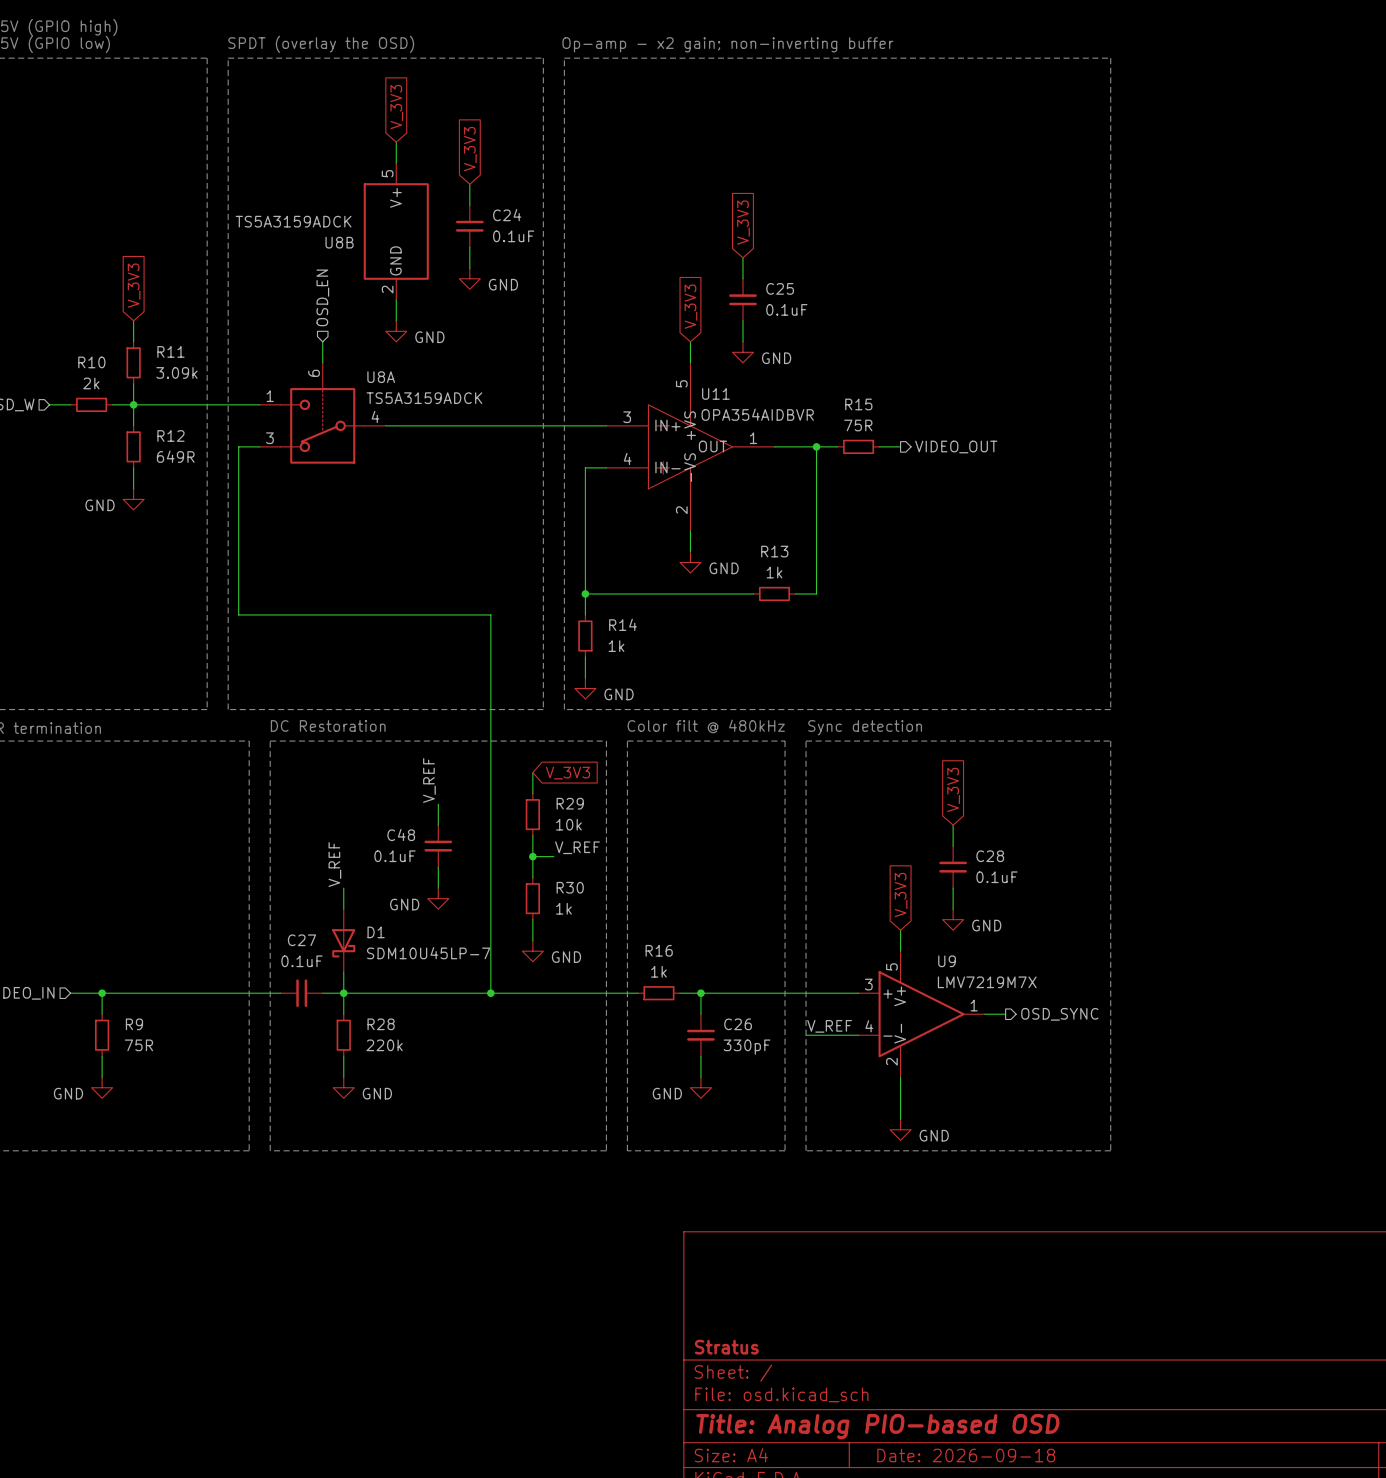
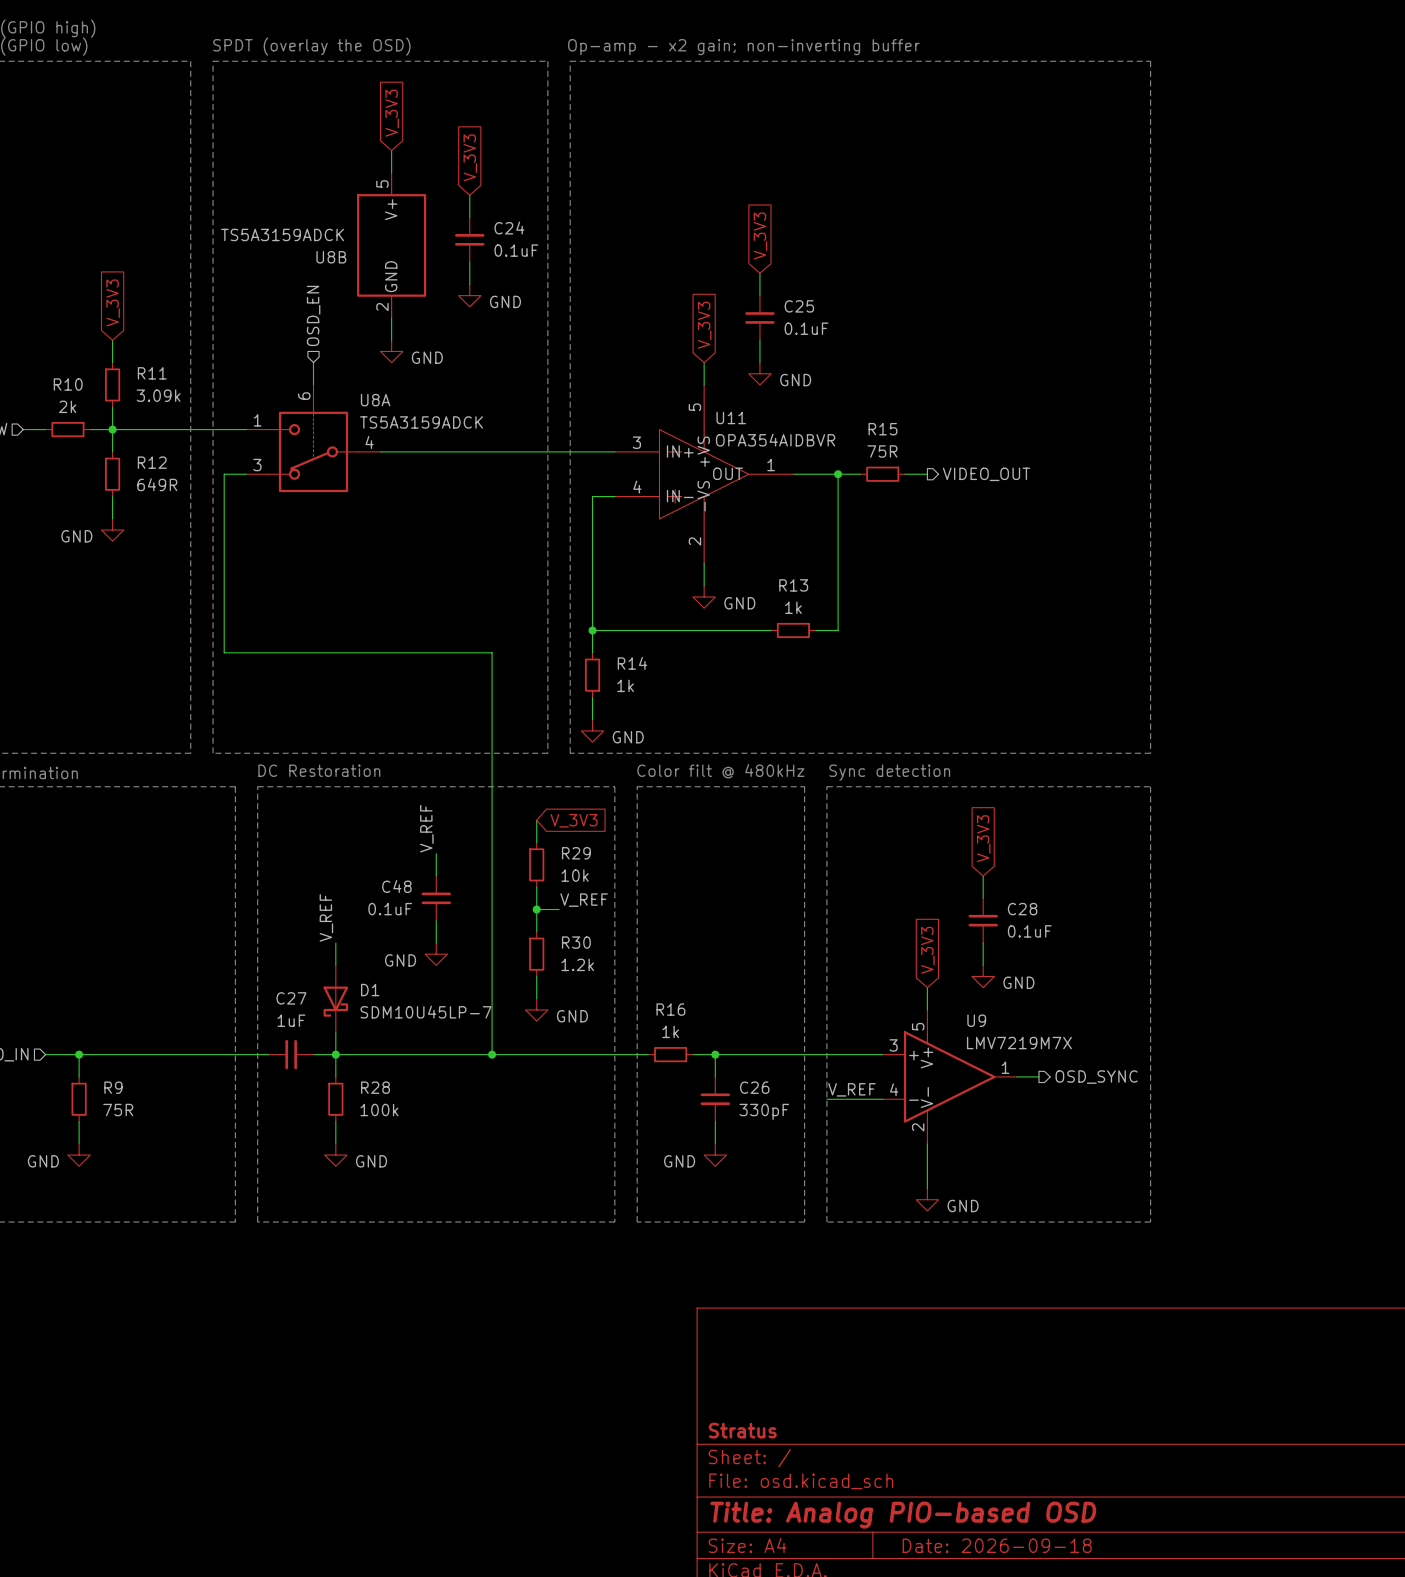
R30 value: 1k (563, 908) -> 1.2k (577, 964)
C27 value: 0.1uF (301, 961) -> 1uF (291, 1020)
R28 value: 220k (384, 1045) -> 100k (379, 1110)

